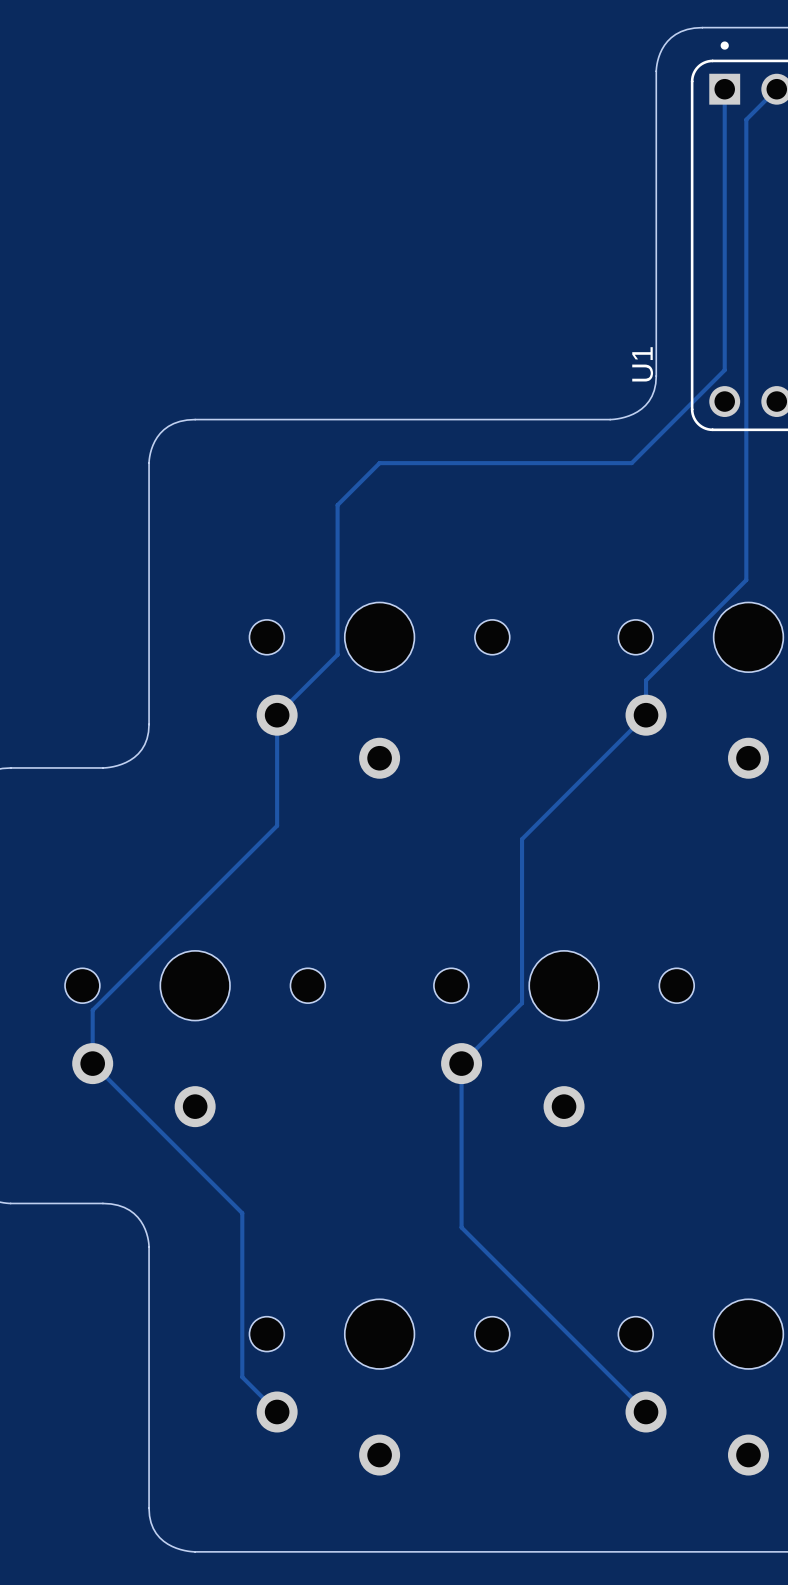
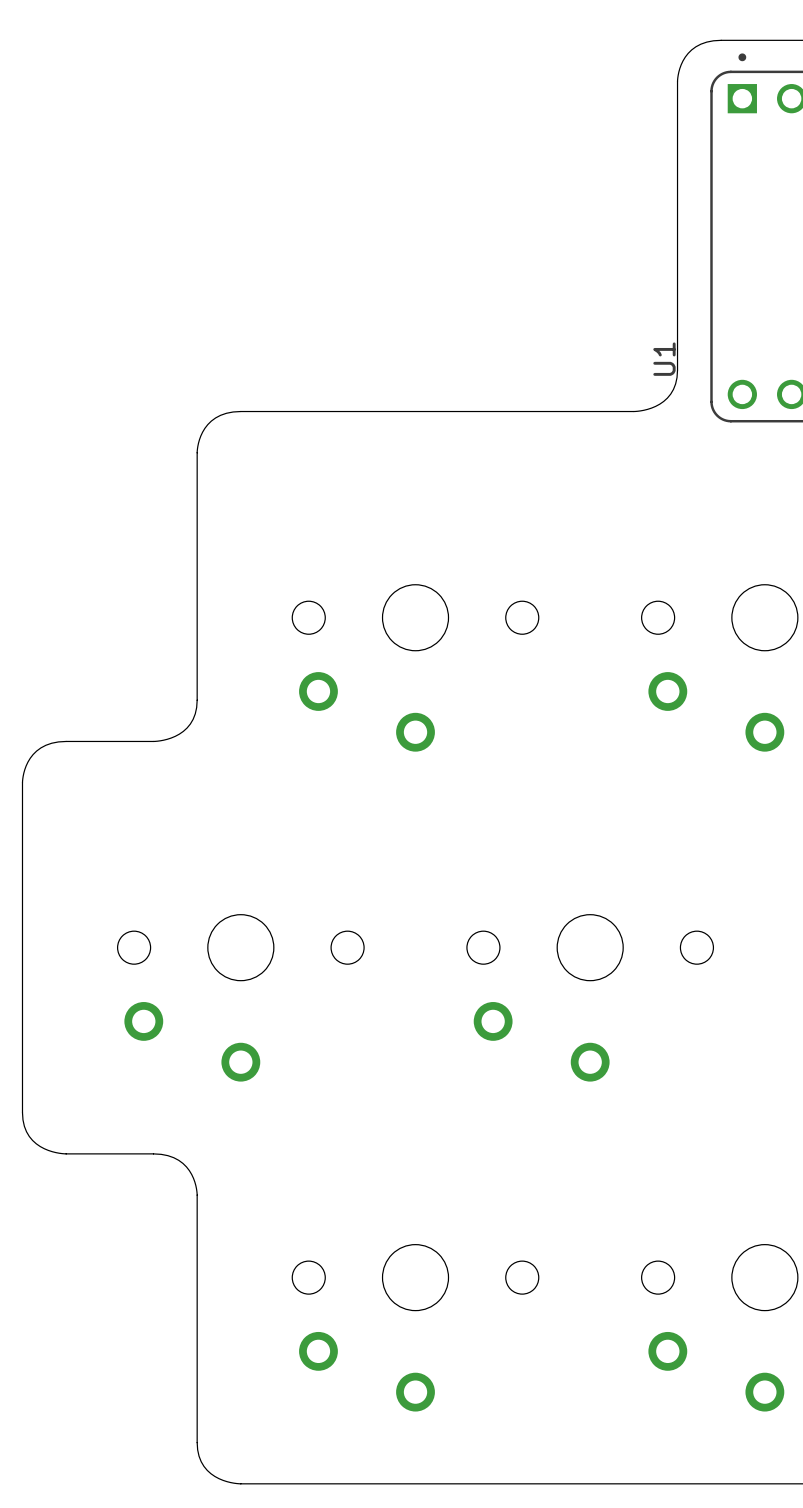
track: (724, 89) (724, 370) (631, 463) (379, 463) (337, 505) (337, 654) (277, 715) -> none
track: (776, 89) (746, 119) (746, 580) (646, 680) (646, 715) (522, 839) (522, 1003) (461, 1063) (461, 1227) (646, 1411) -> none
track: (277, 715) (277, 825) (92, 1010) (92, 1063) (242, 1213) (242, 1377) (277, 1411) -> none

